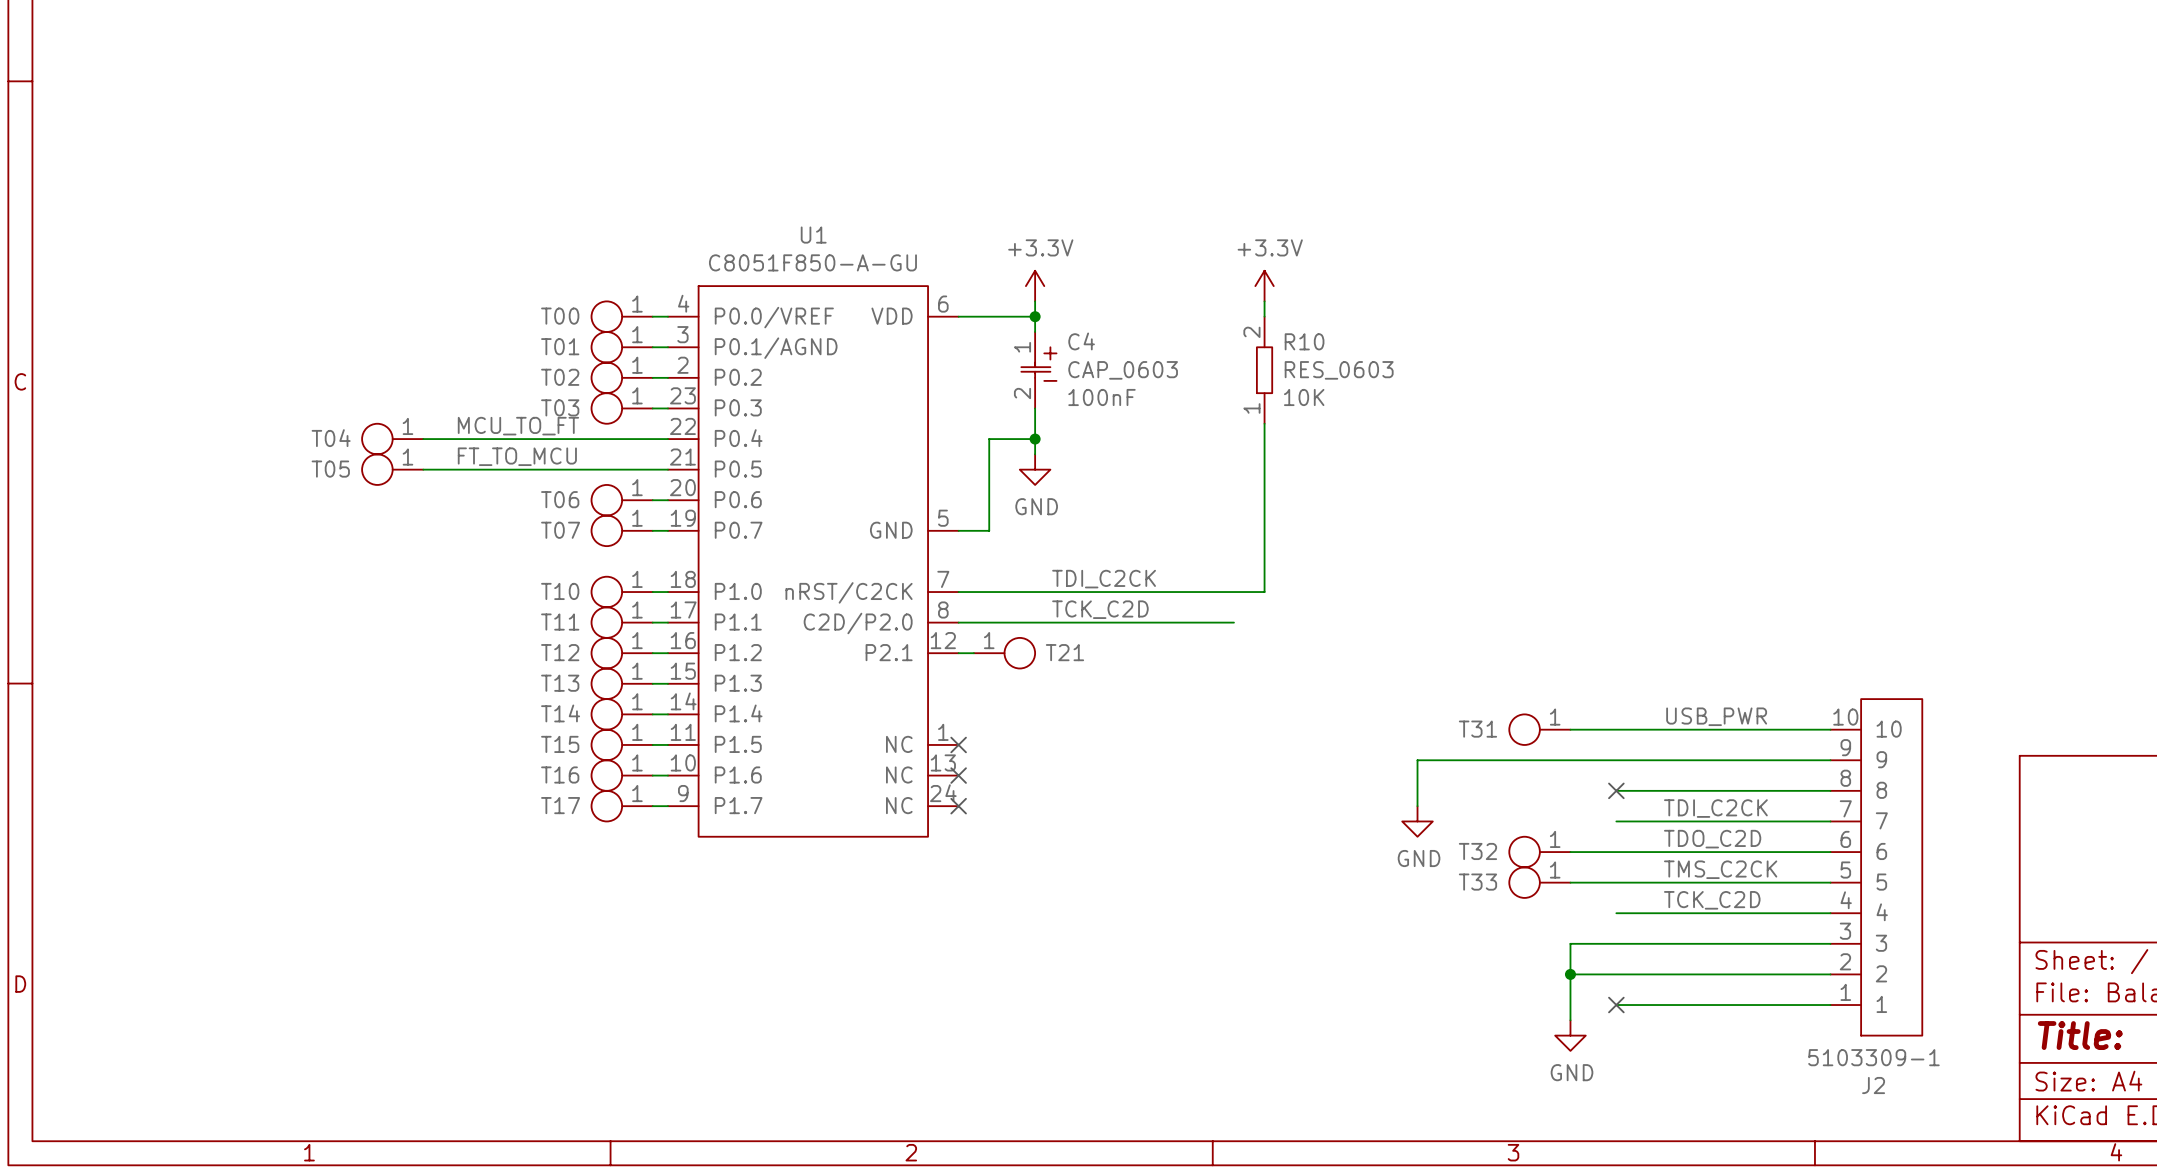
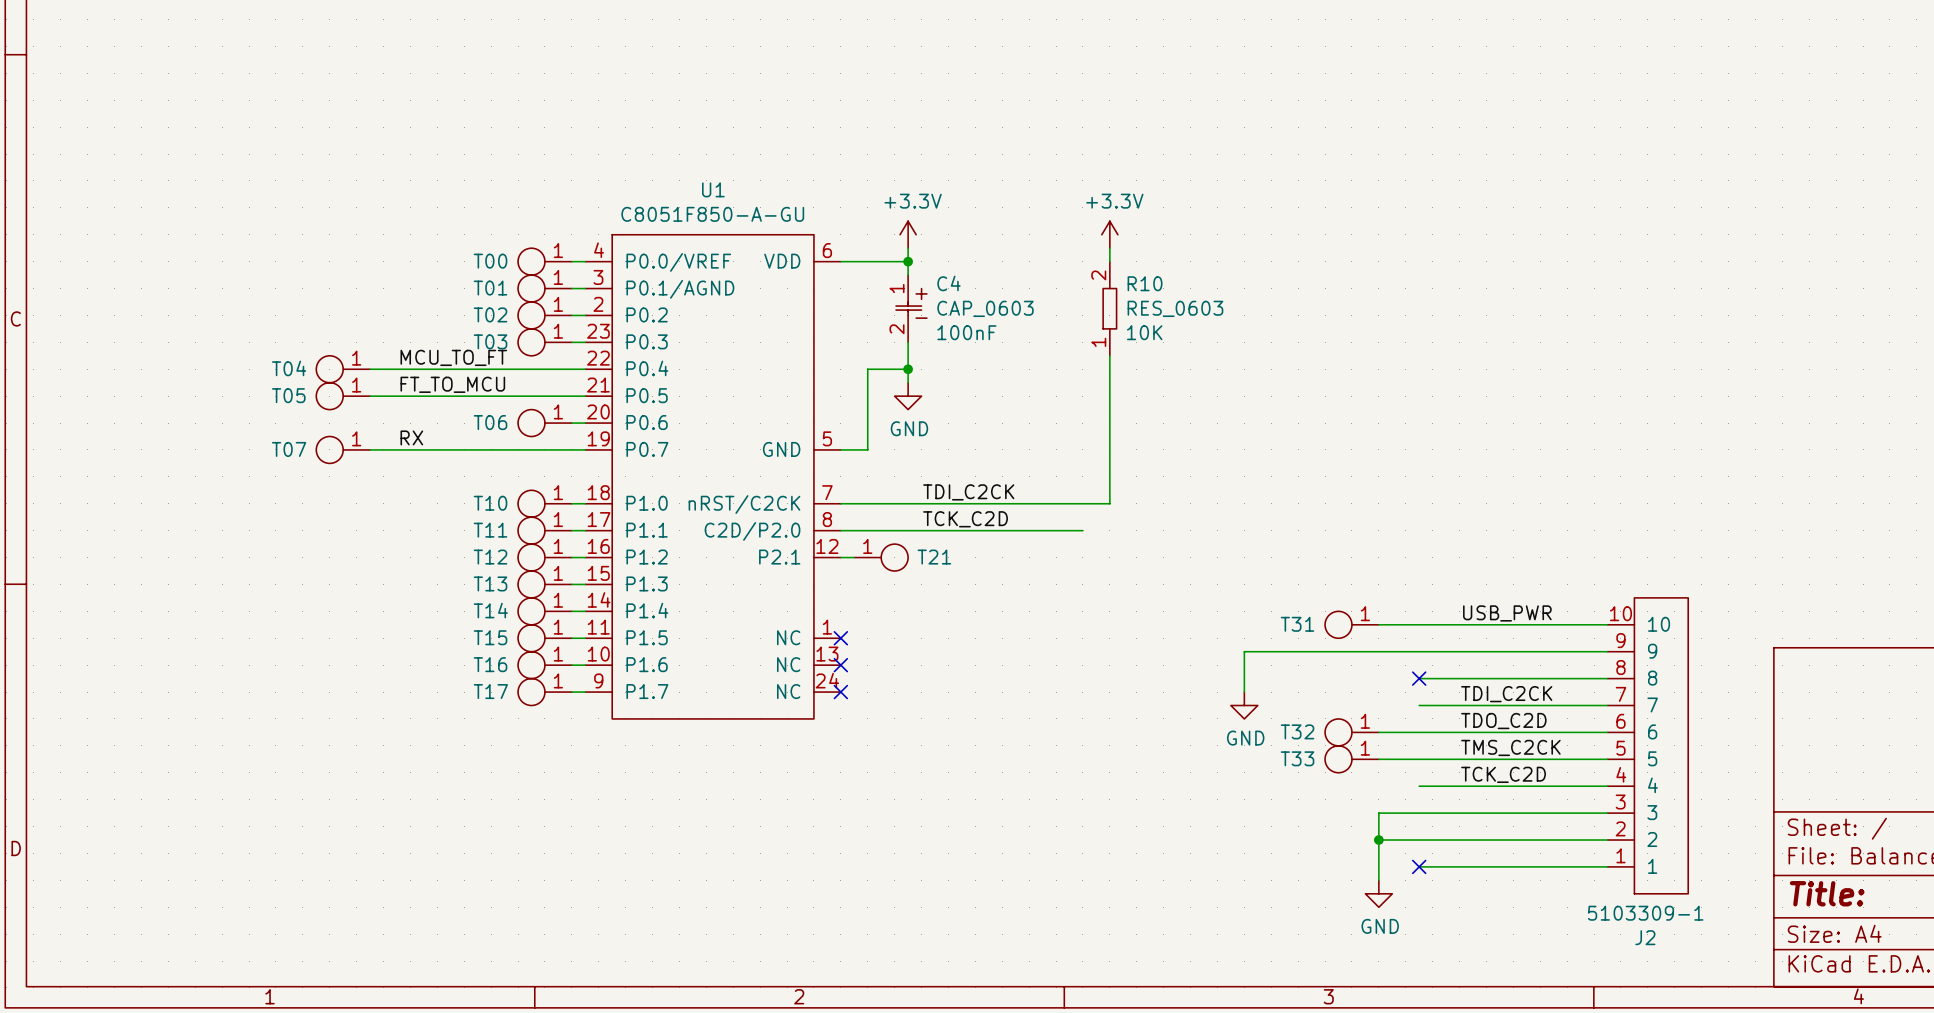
label: none -> RX (411, 437)
wire: none -> (370, 449) (571, 449)
T07 position: (622, 530) -> (343, 449)

